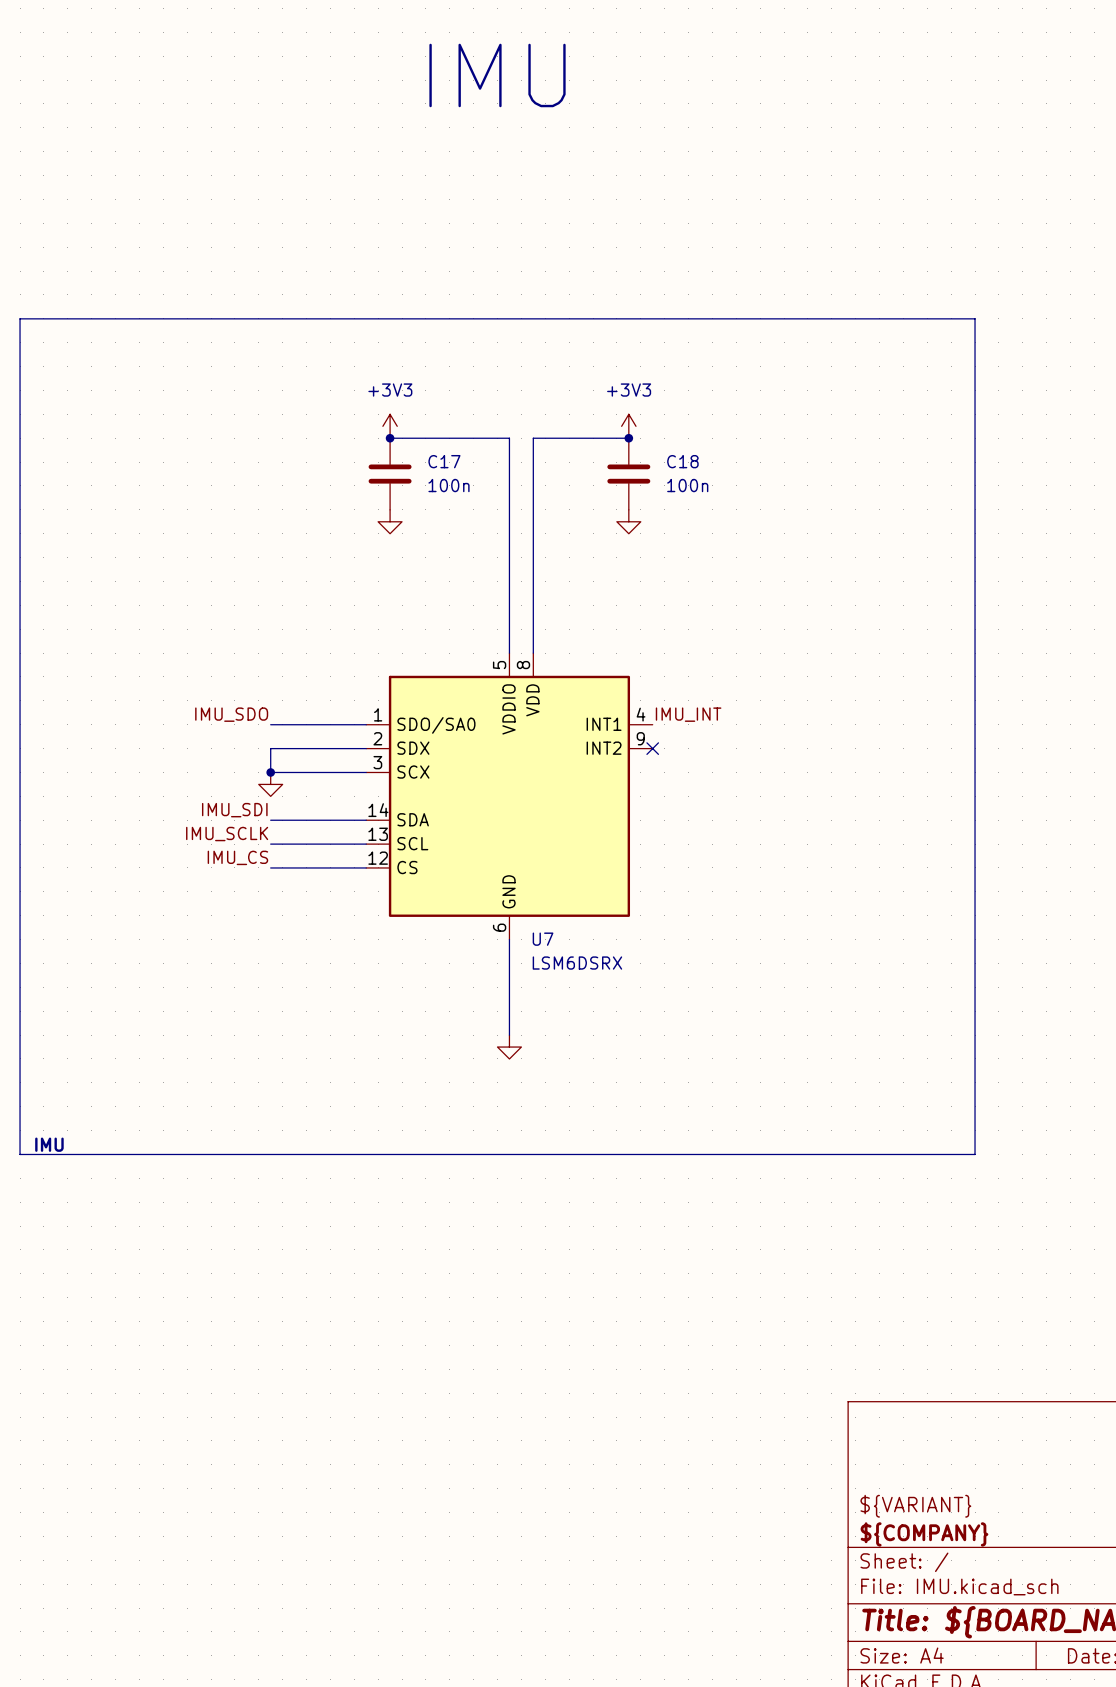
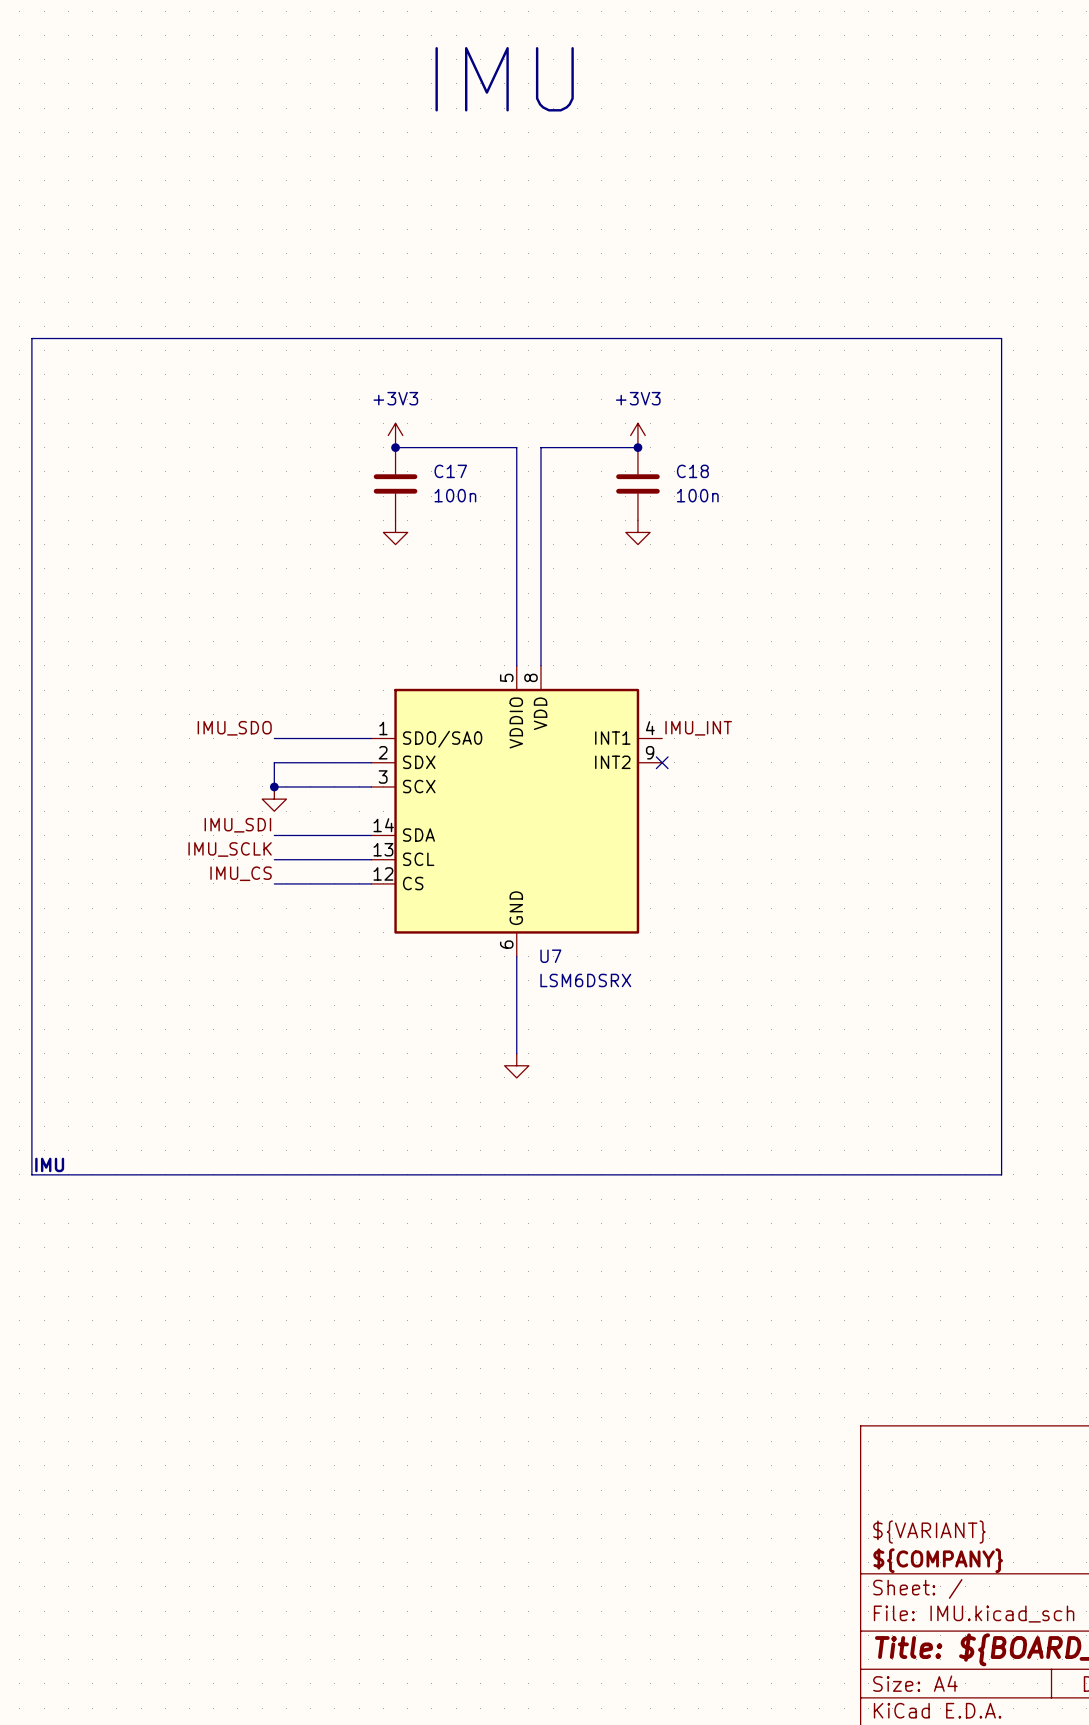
line: (31, 1154) (20, 1154) (20, 318) (975, 318) (975, 1154) -> (31, 1174) (31, 338) (1001, 338) (1001, 1174) (989, 1174)

